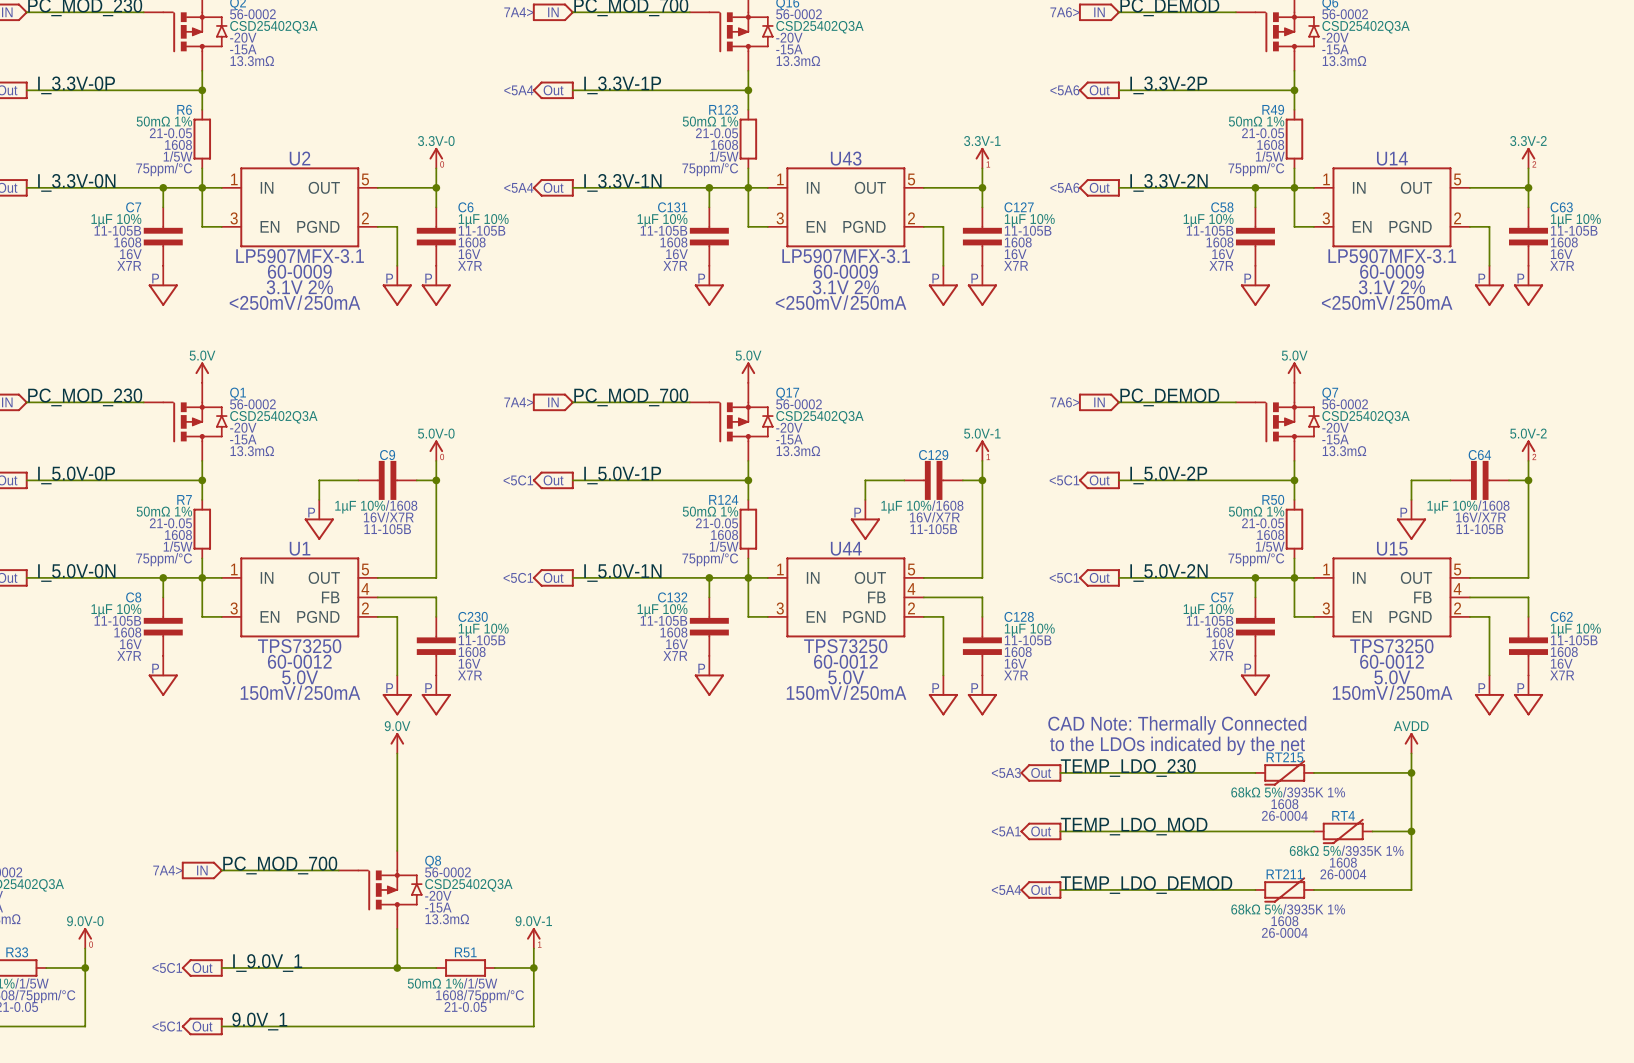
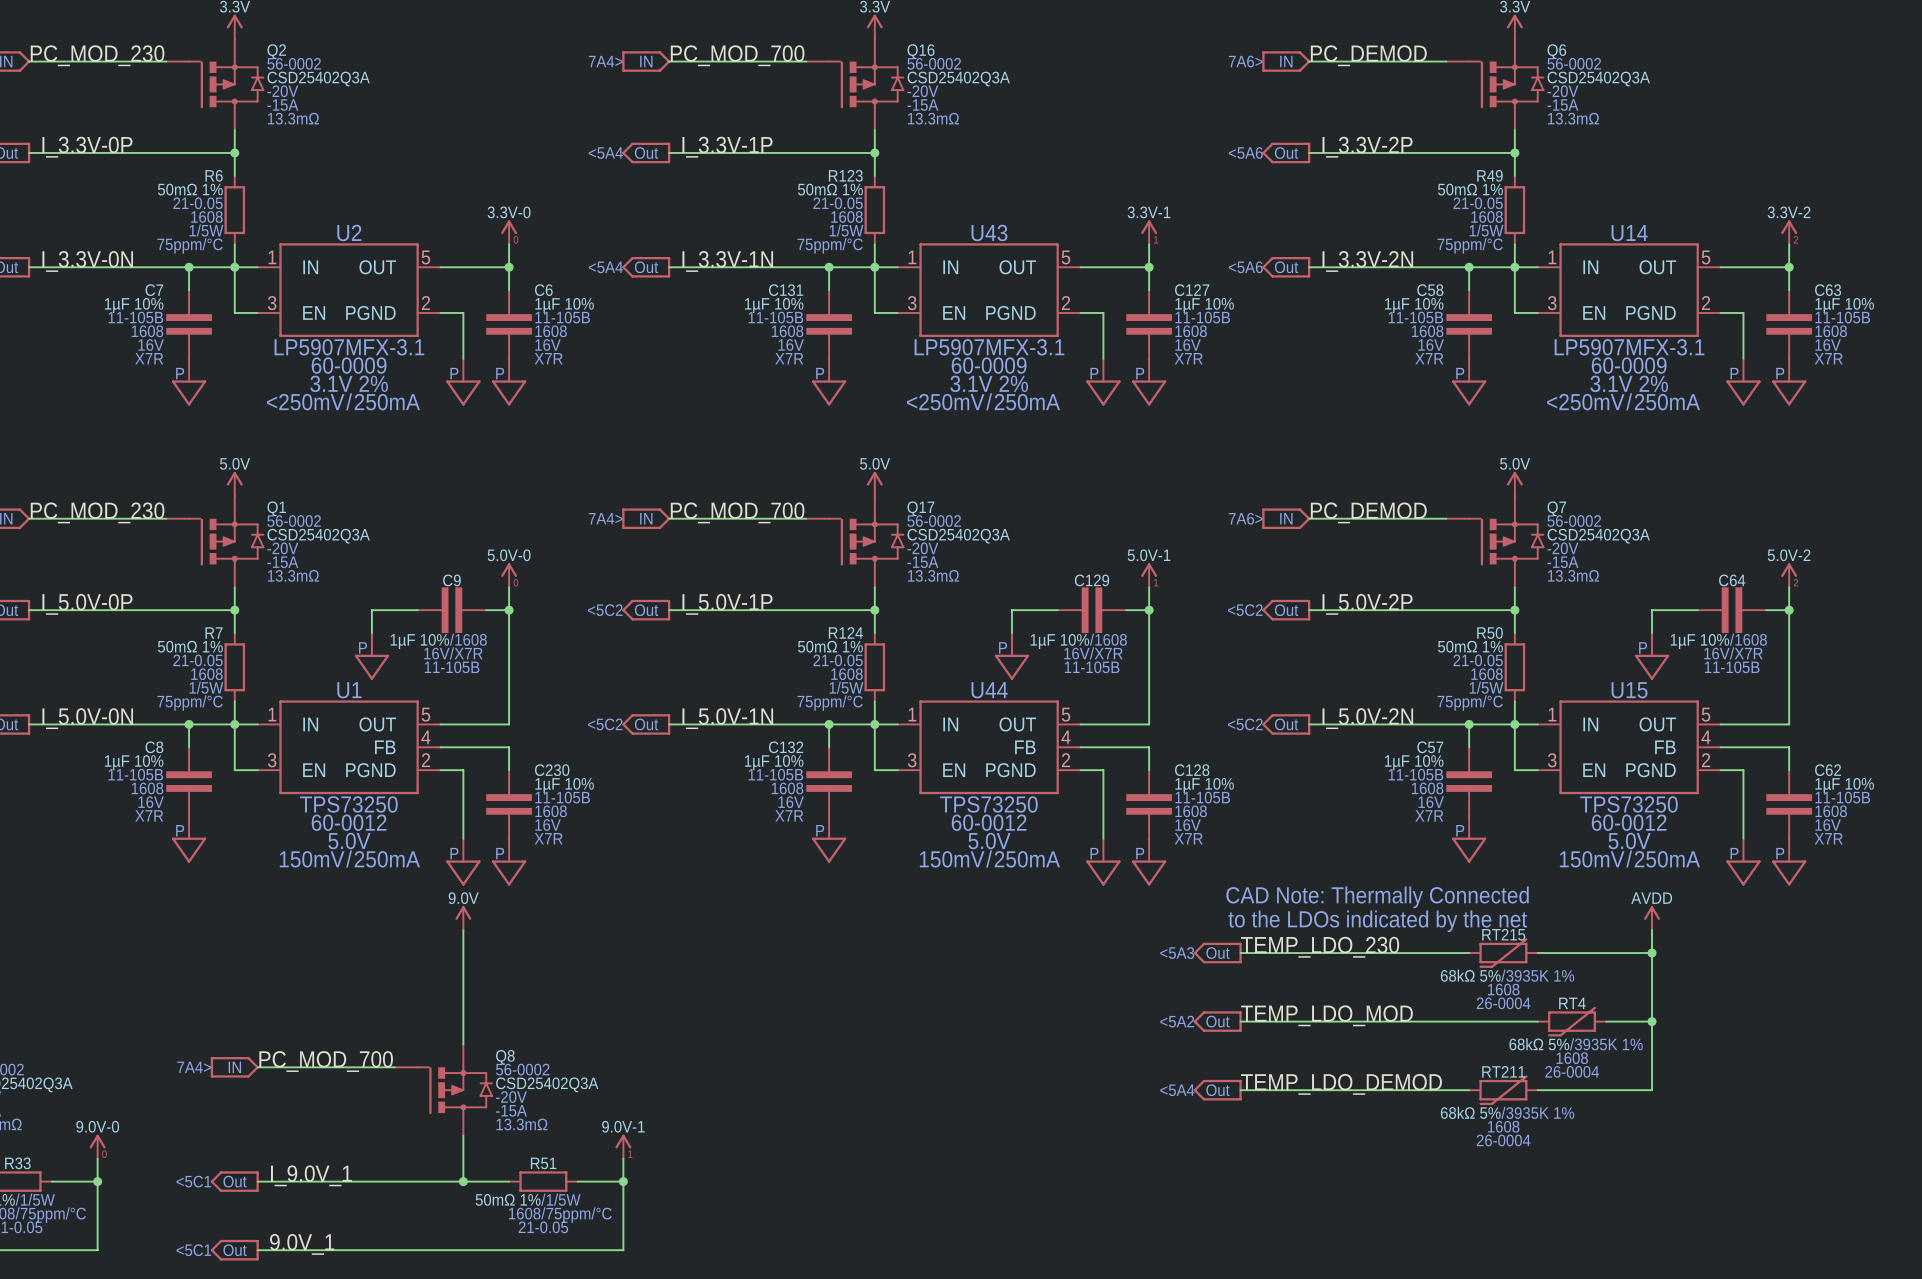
text: <5C1 (518, 480) -> <5C2 (605, 610)
text: <5C1 (1064, 480) -> <5C2 (1245, 610)
text: <5C1 (518, 577) -> <5C2 (605, 724)
text: <5C1 (1064, 577) -> <5C2 (1245, 724)
text: <5A1 (1006, 831) -> <5A2 (1177, 1021)

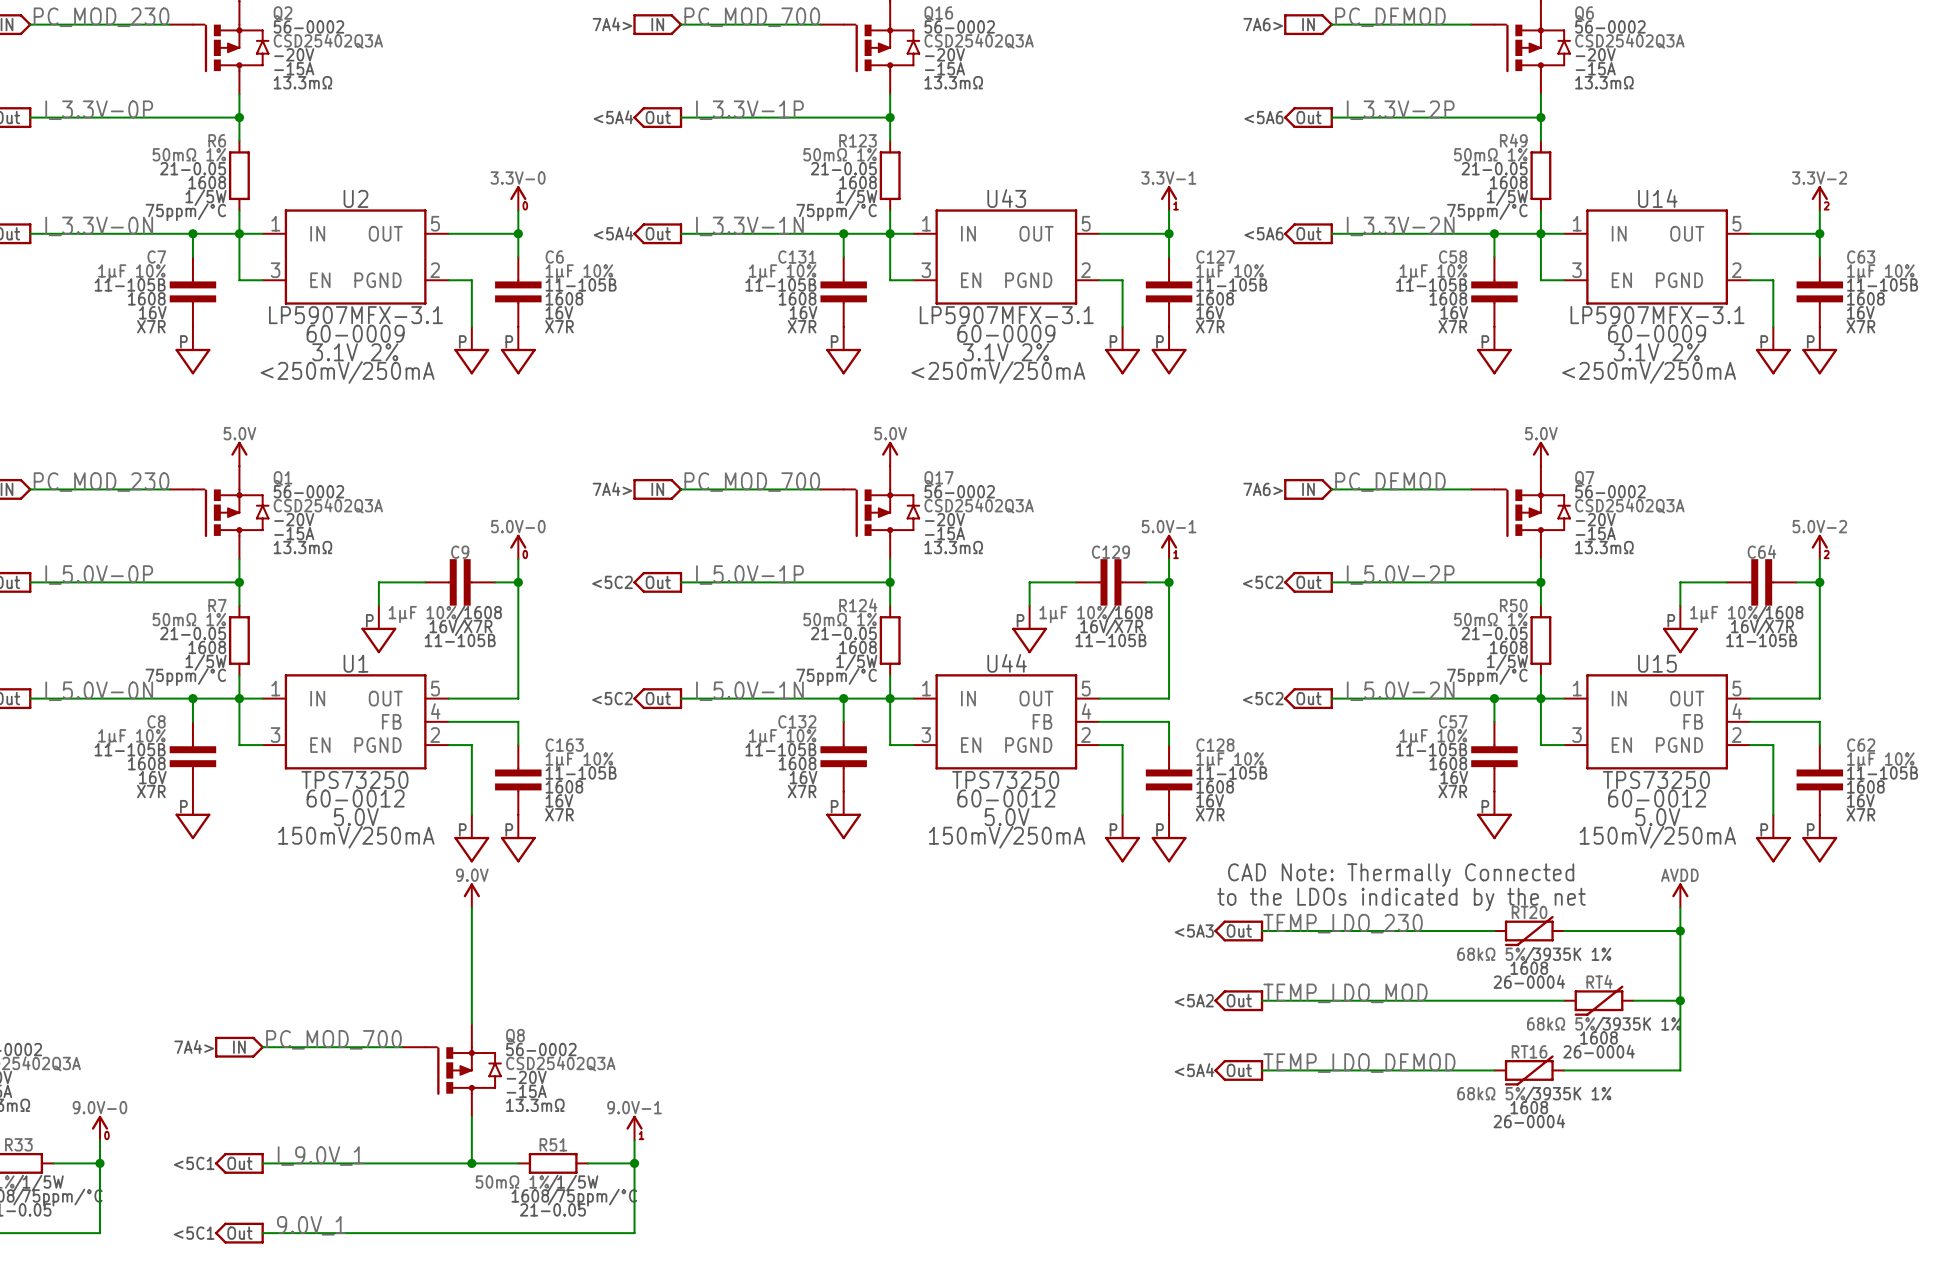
C230 name: C230 (552, 770) -> C163 (564, 745)
RT215 name: RT215 (1503, 934) -> RT20 (1529, 912)
RT211 name: RT211 (1503, 1071) -> RT16 (1529, 1051)

